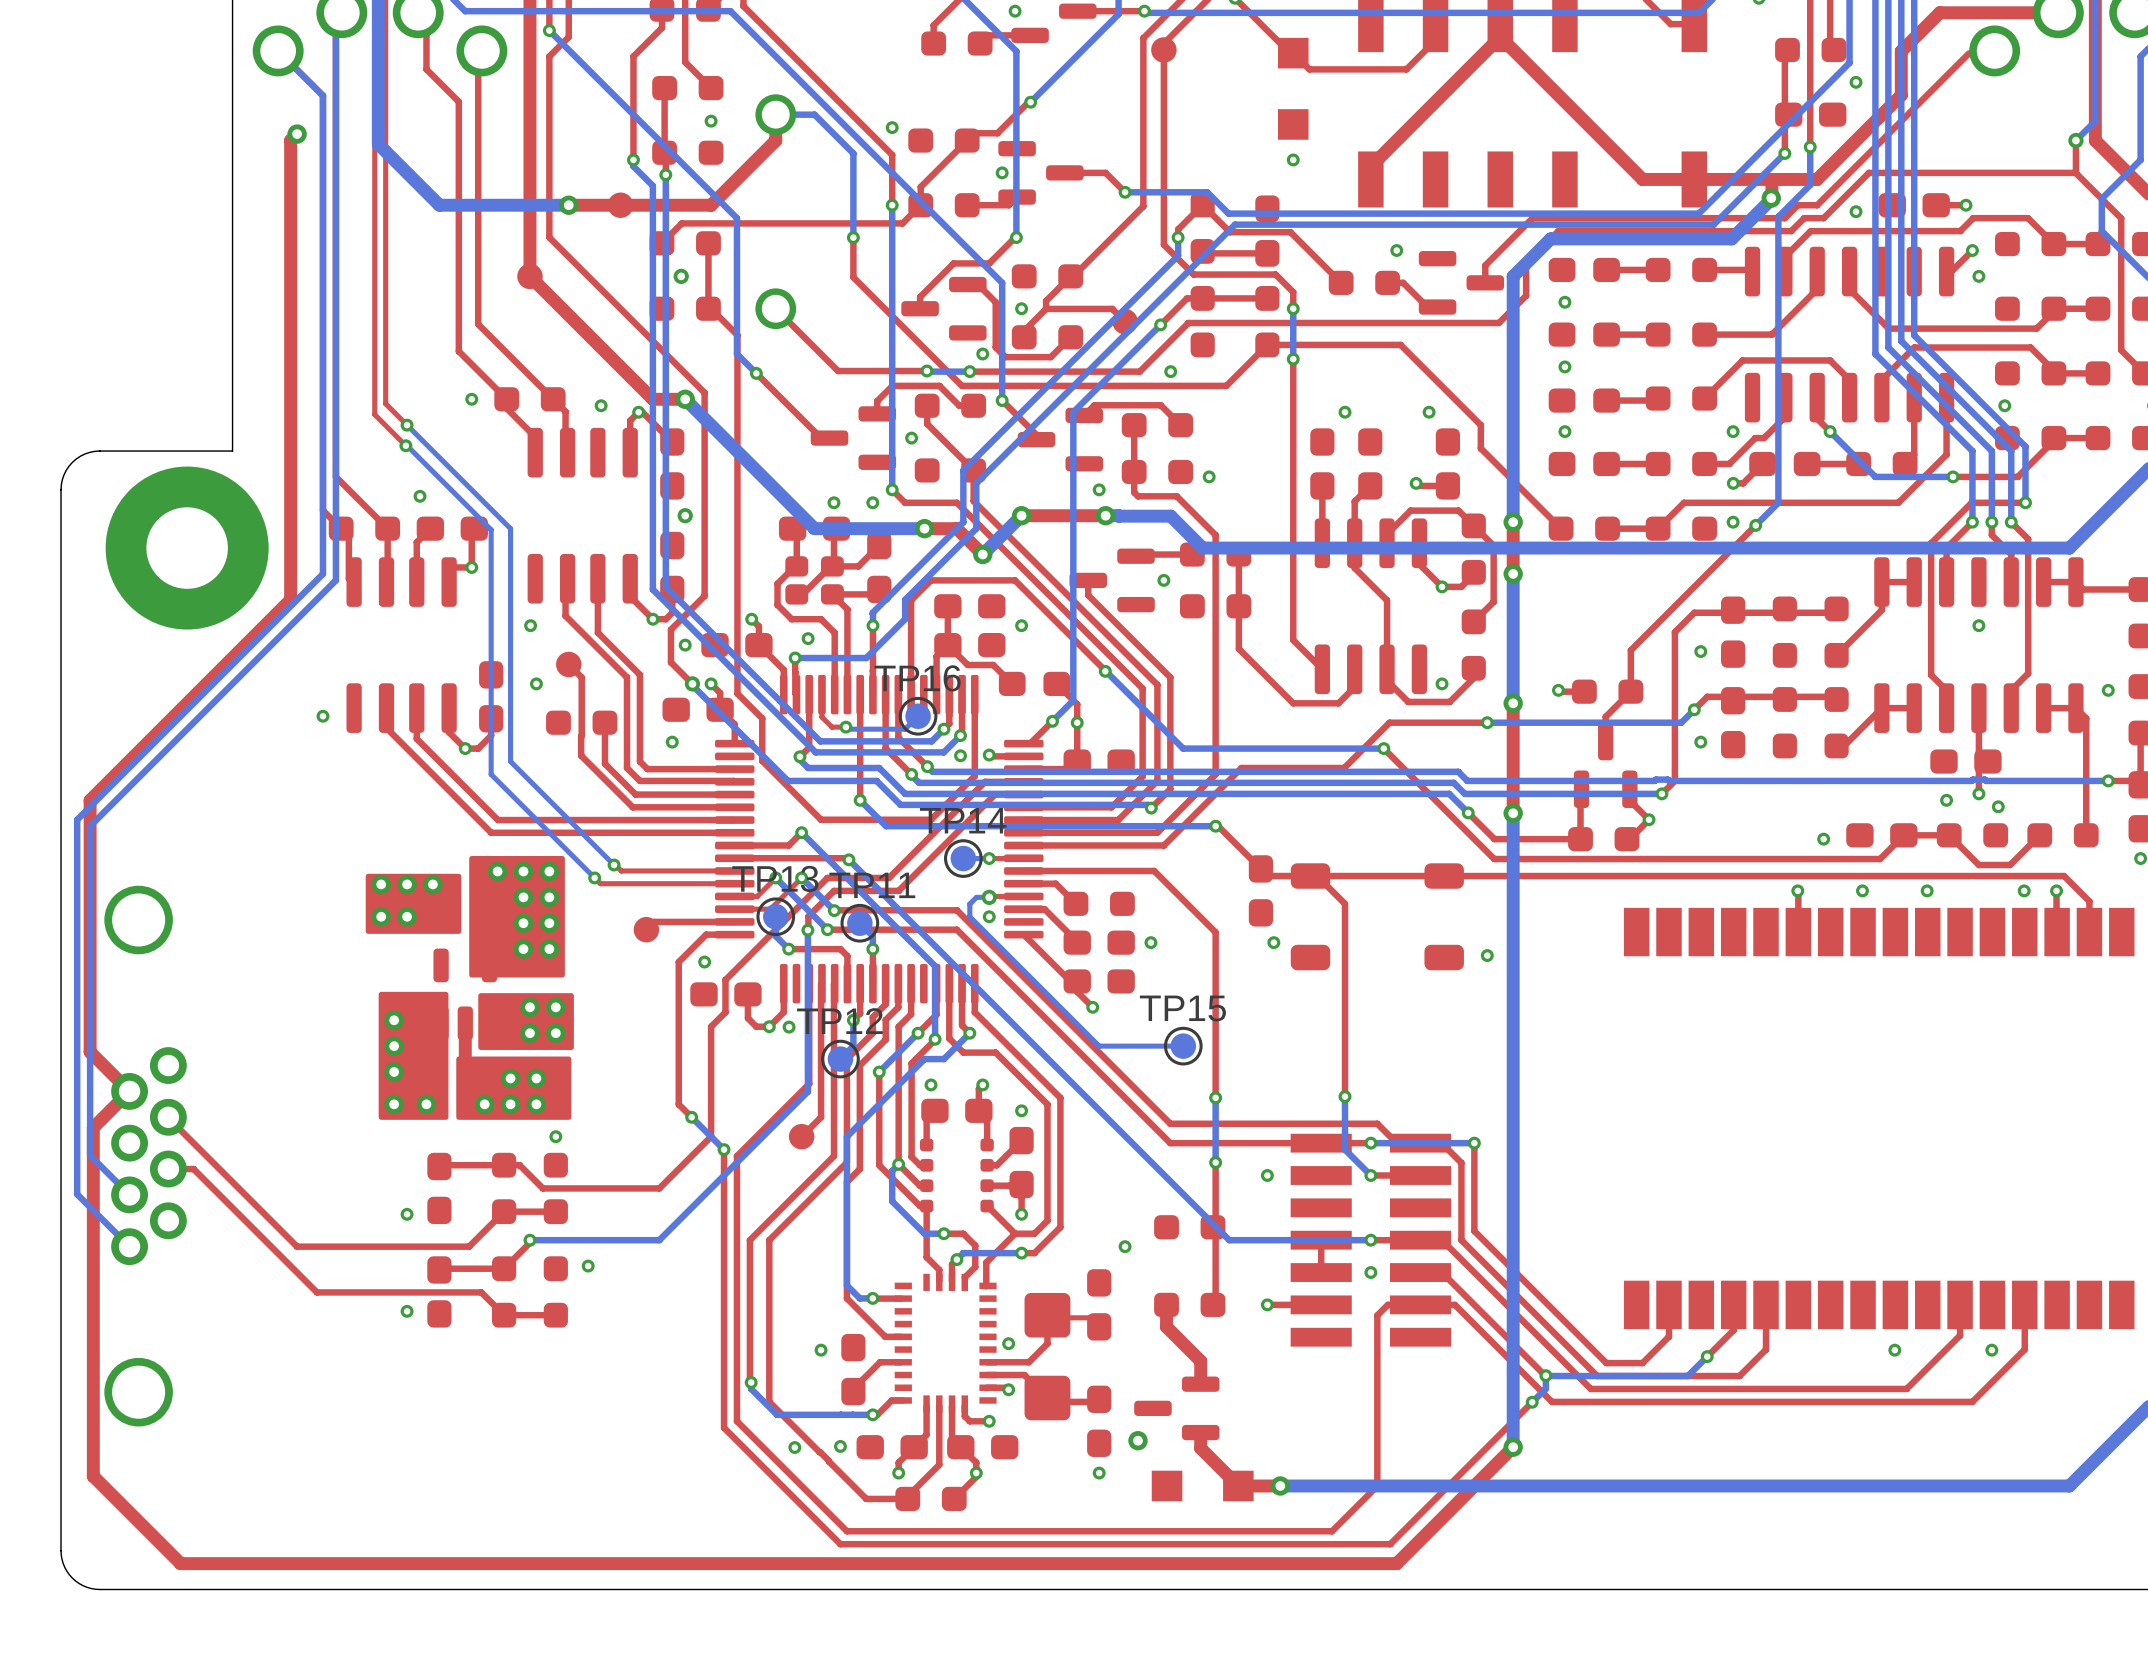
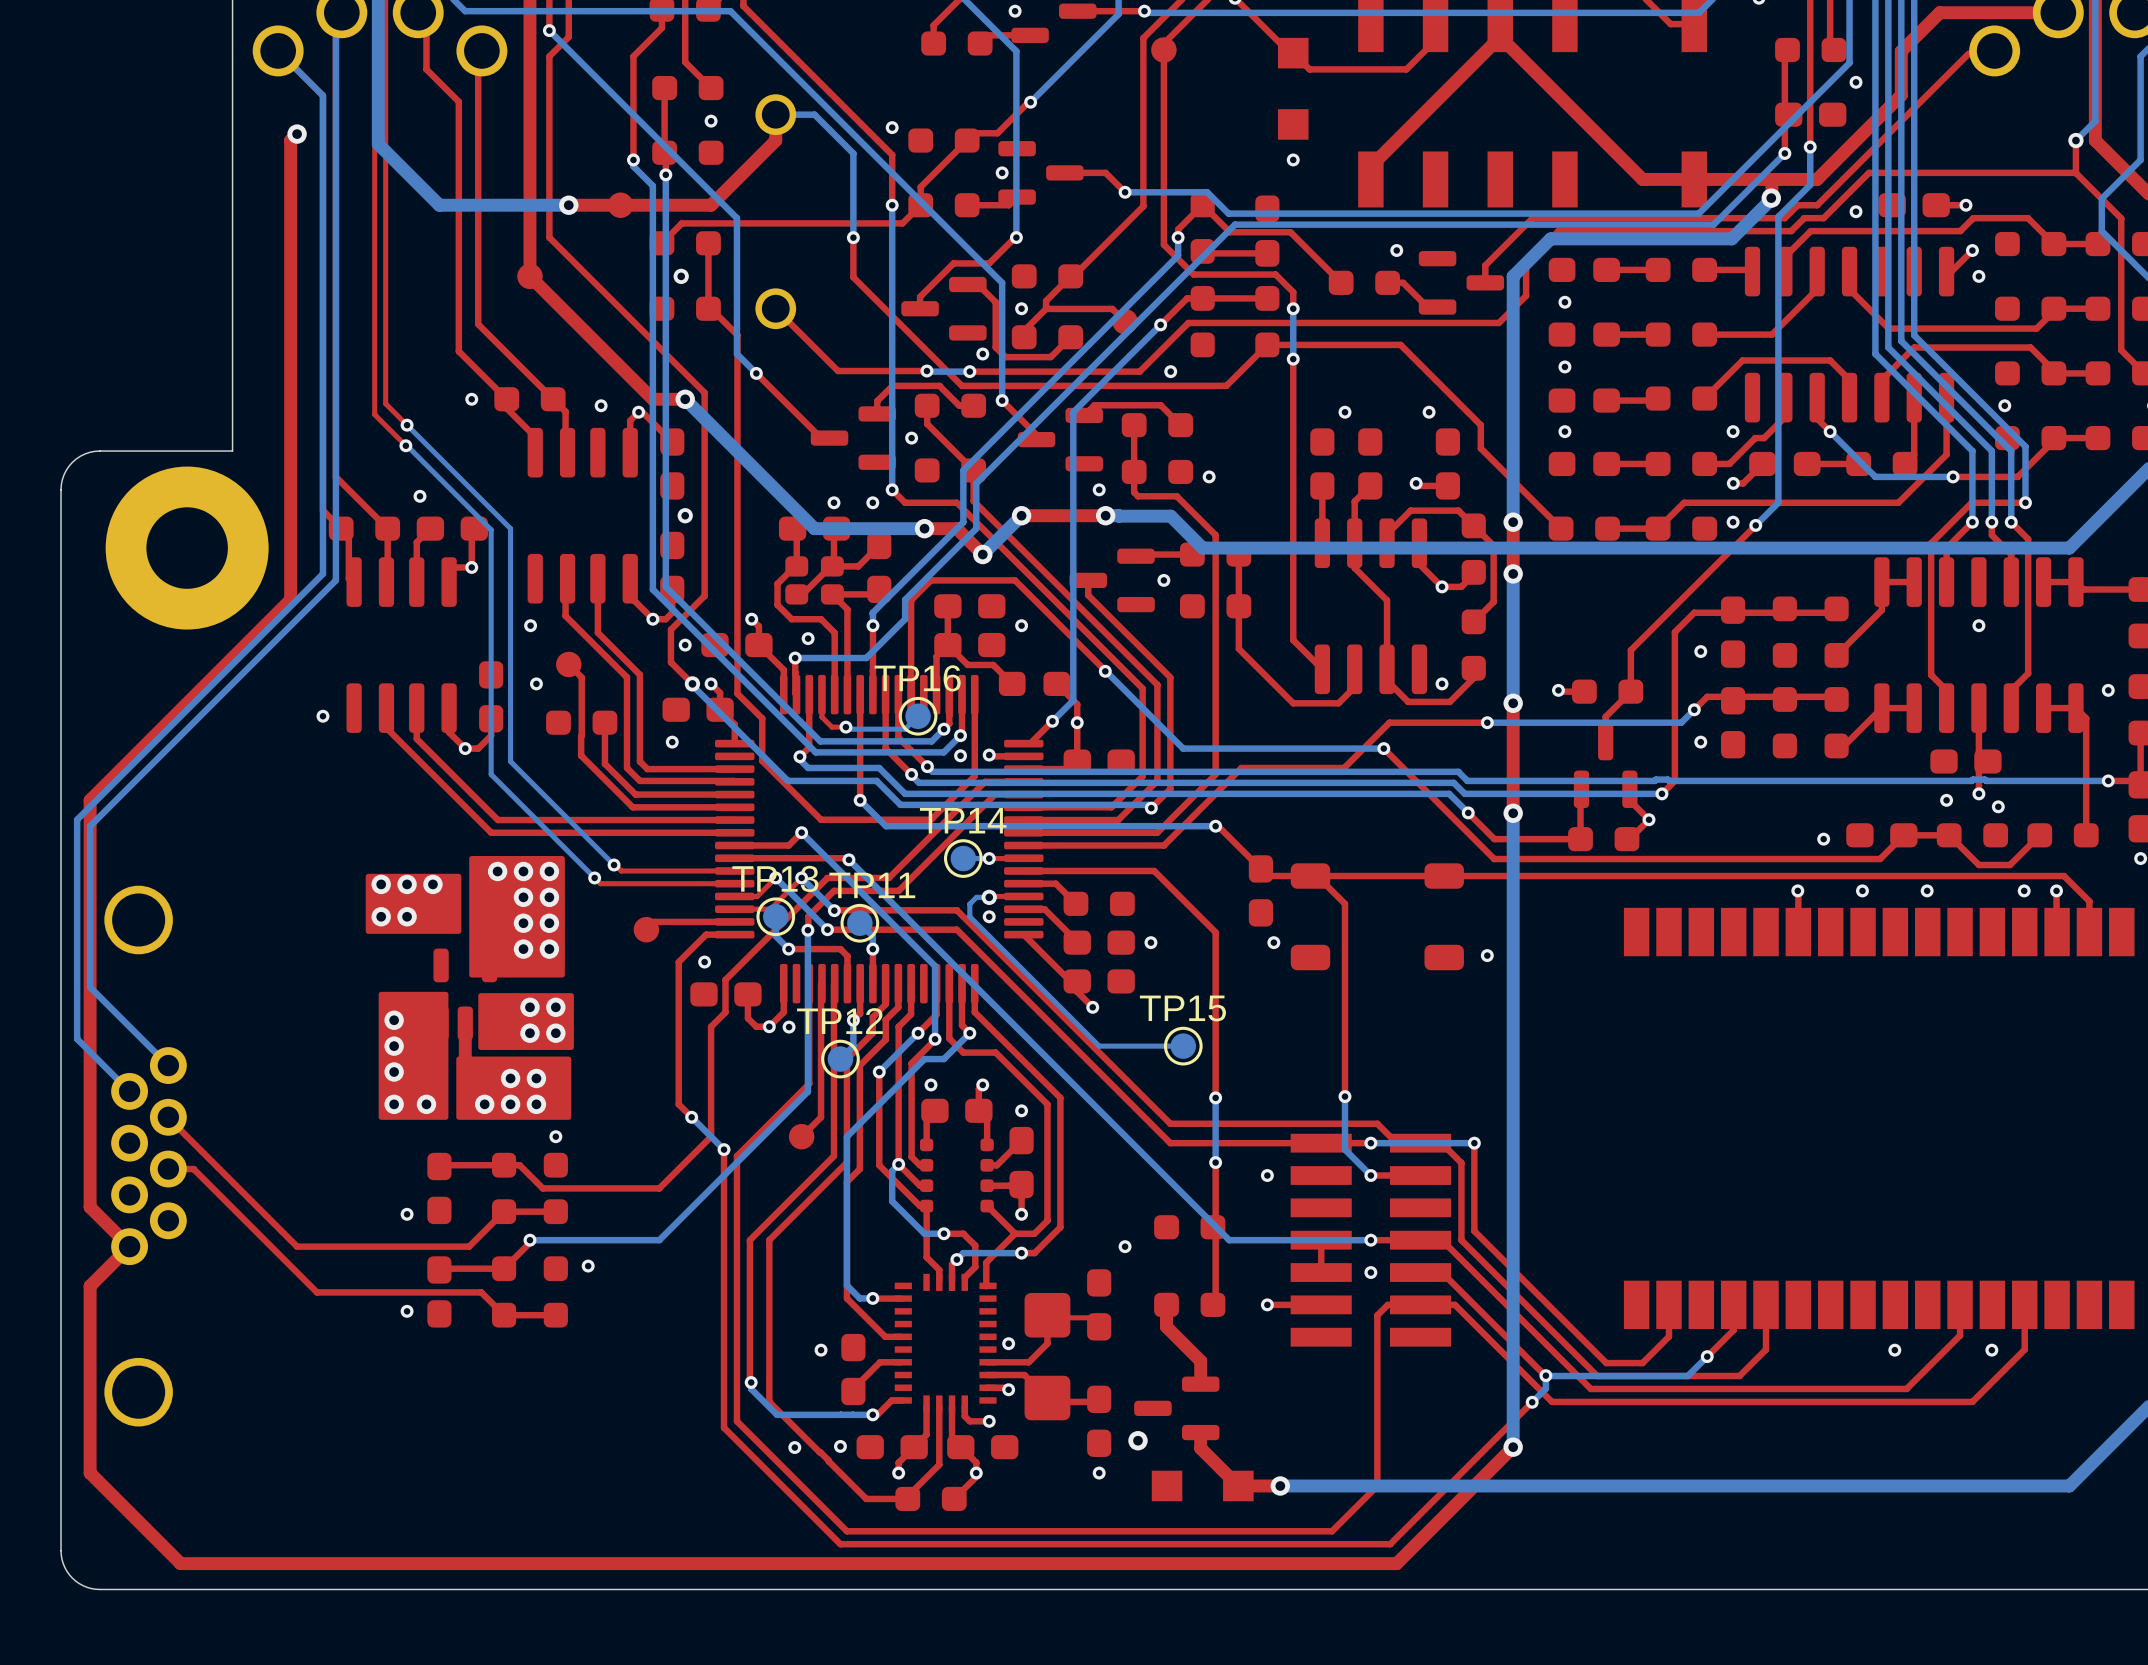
bottom track: (90, 987) (90, 1155) (129, 1194) -> (90, 987) (168, 1065)
bottom track: (77, 1039) (77, 1194) (129, 1246) -> (77, 1039) (129, 1091)
top track: (90, 1051) (129, 1091) (93, 1127) (93, 1476) -> (90, 1051) (90, 1207) (129, 1246) (90, 1286) (90, 1473) (93, 1476)

